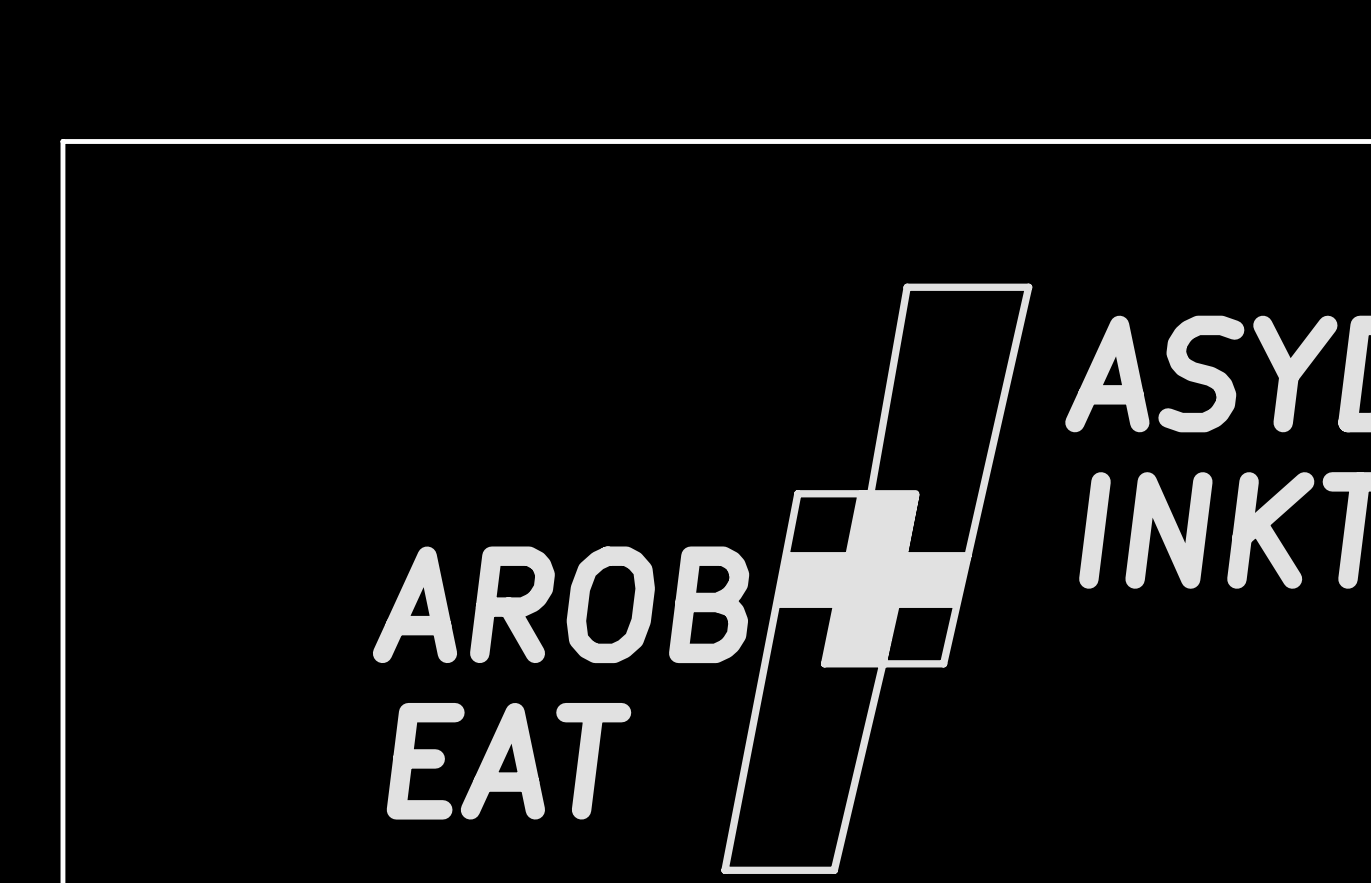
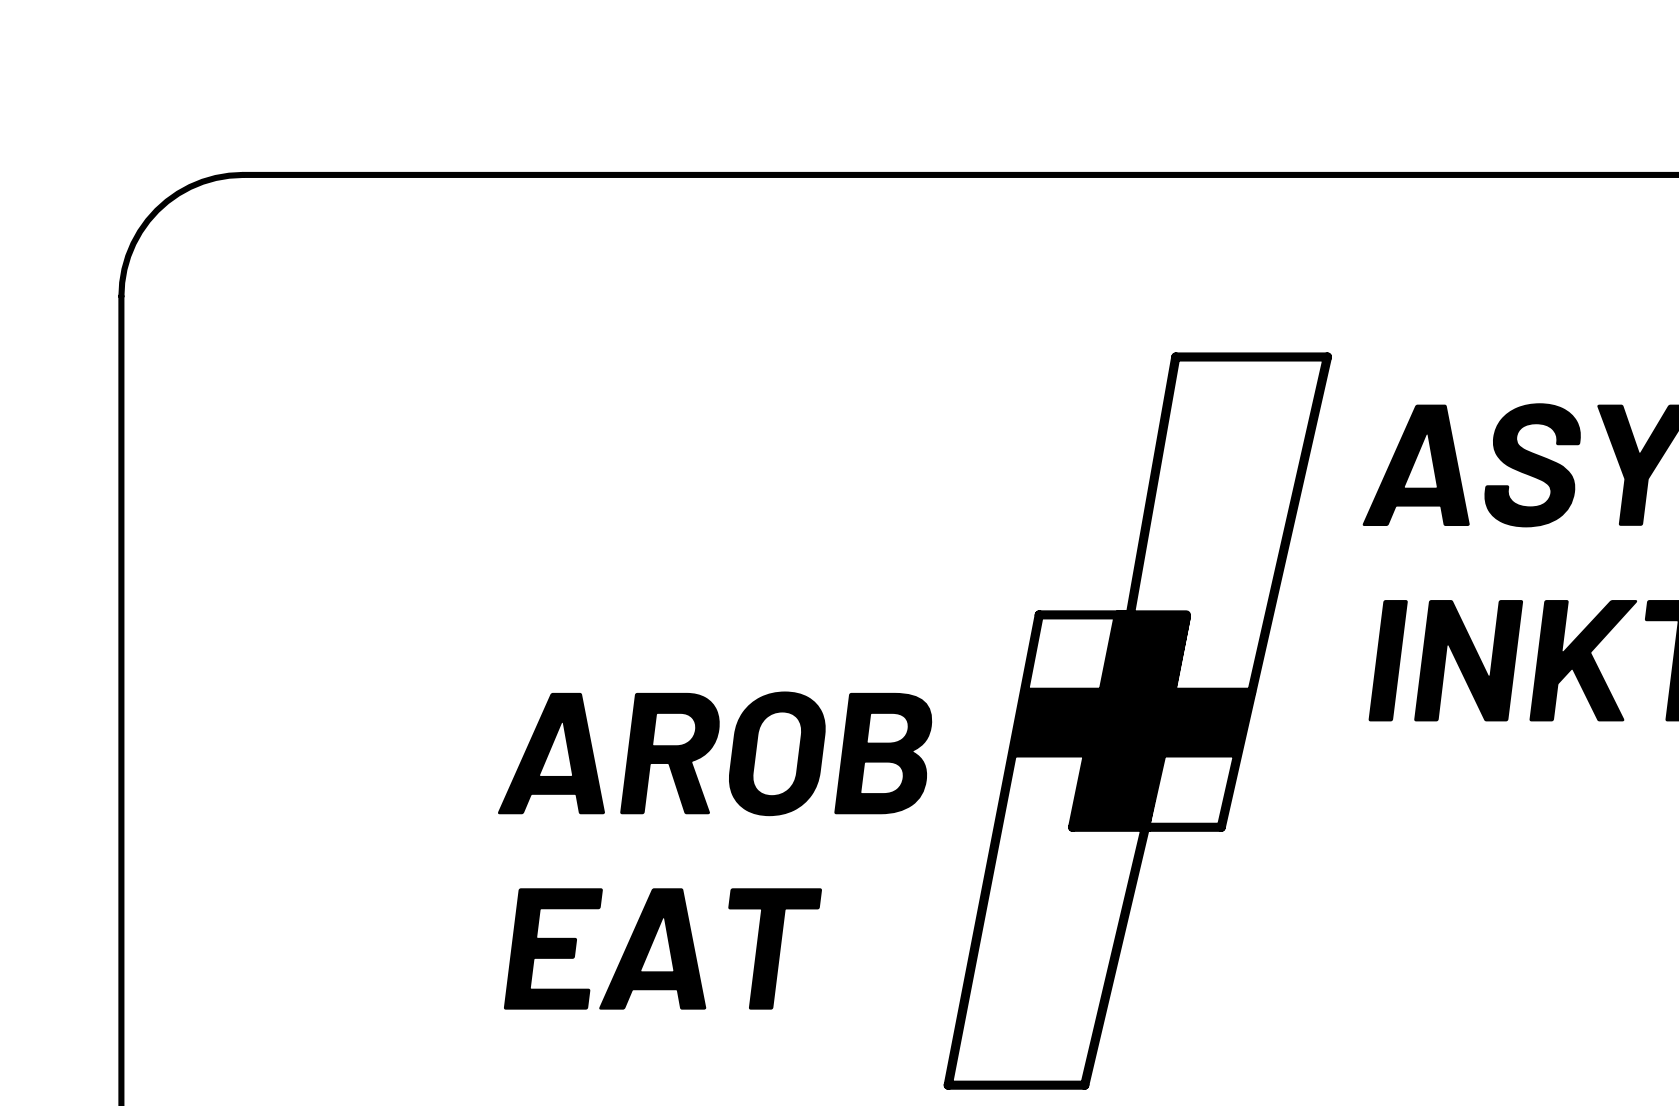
board edge: (160, 141) (62, 141) (62, 238) -> (242, 174) (215, 177) (190, 186) (178, 193) (156, 210) (140, 231) (128, 256) (124, 269) (121, 296)

